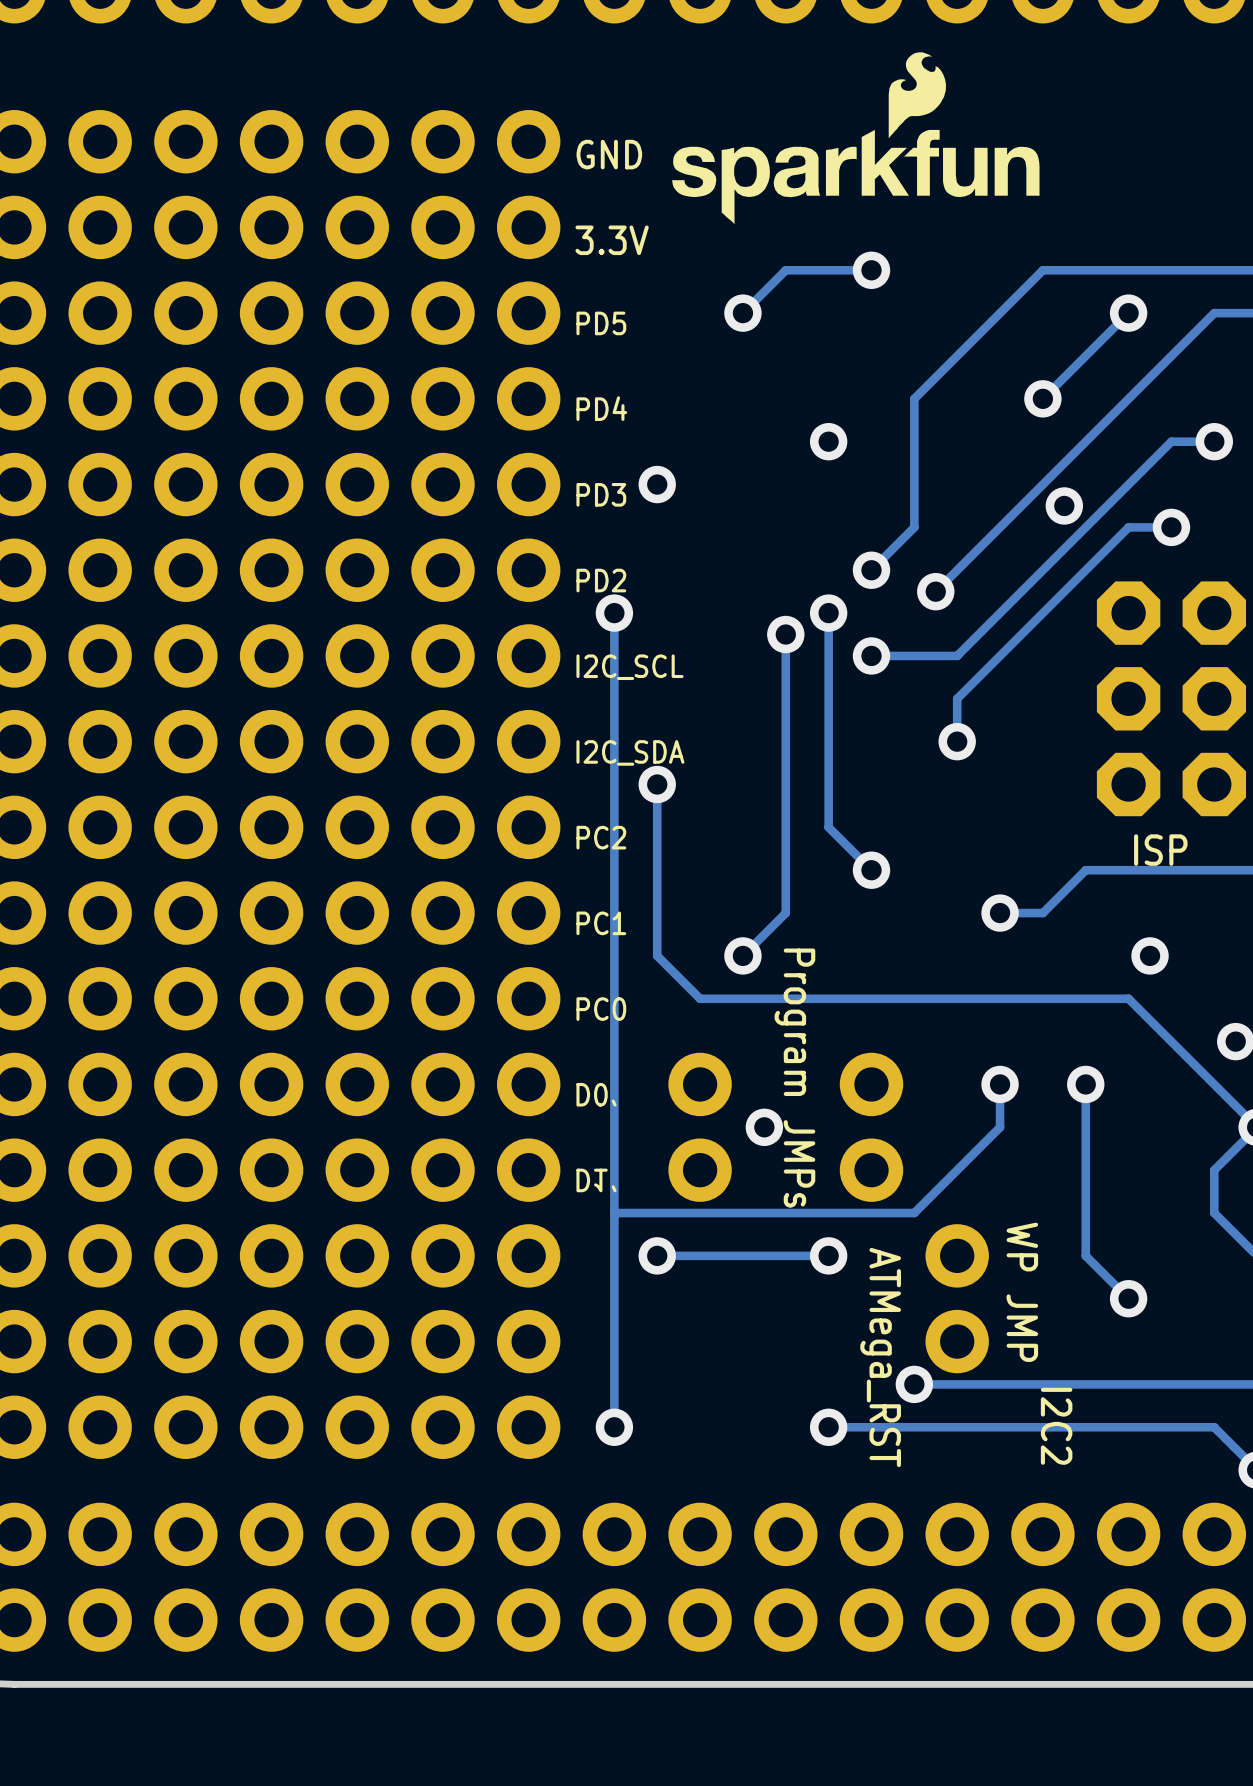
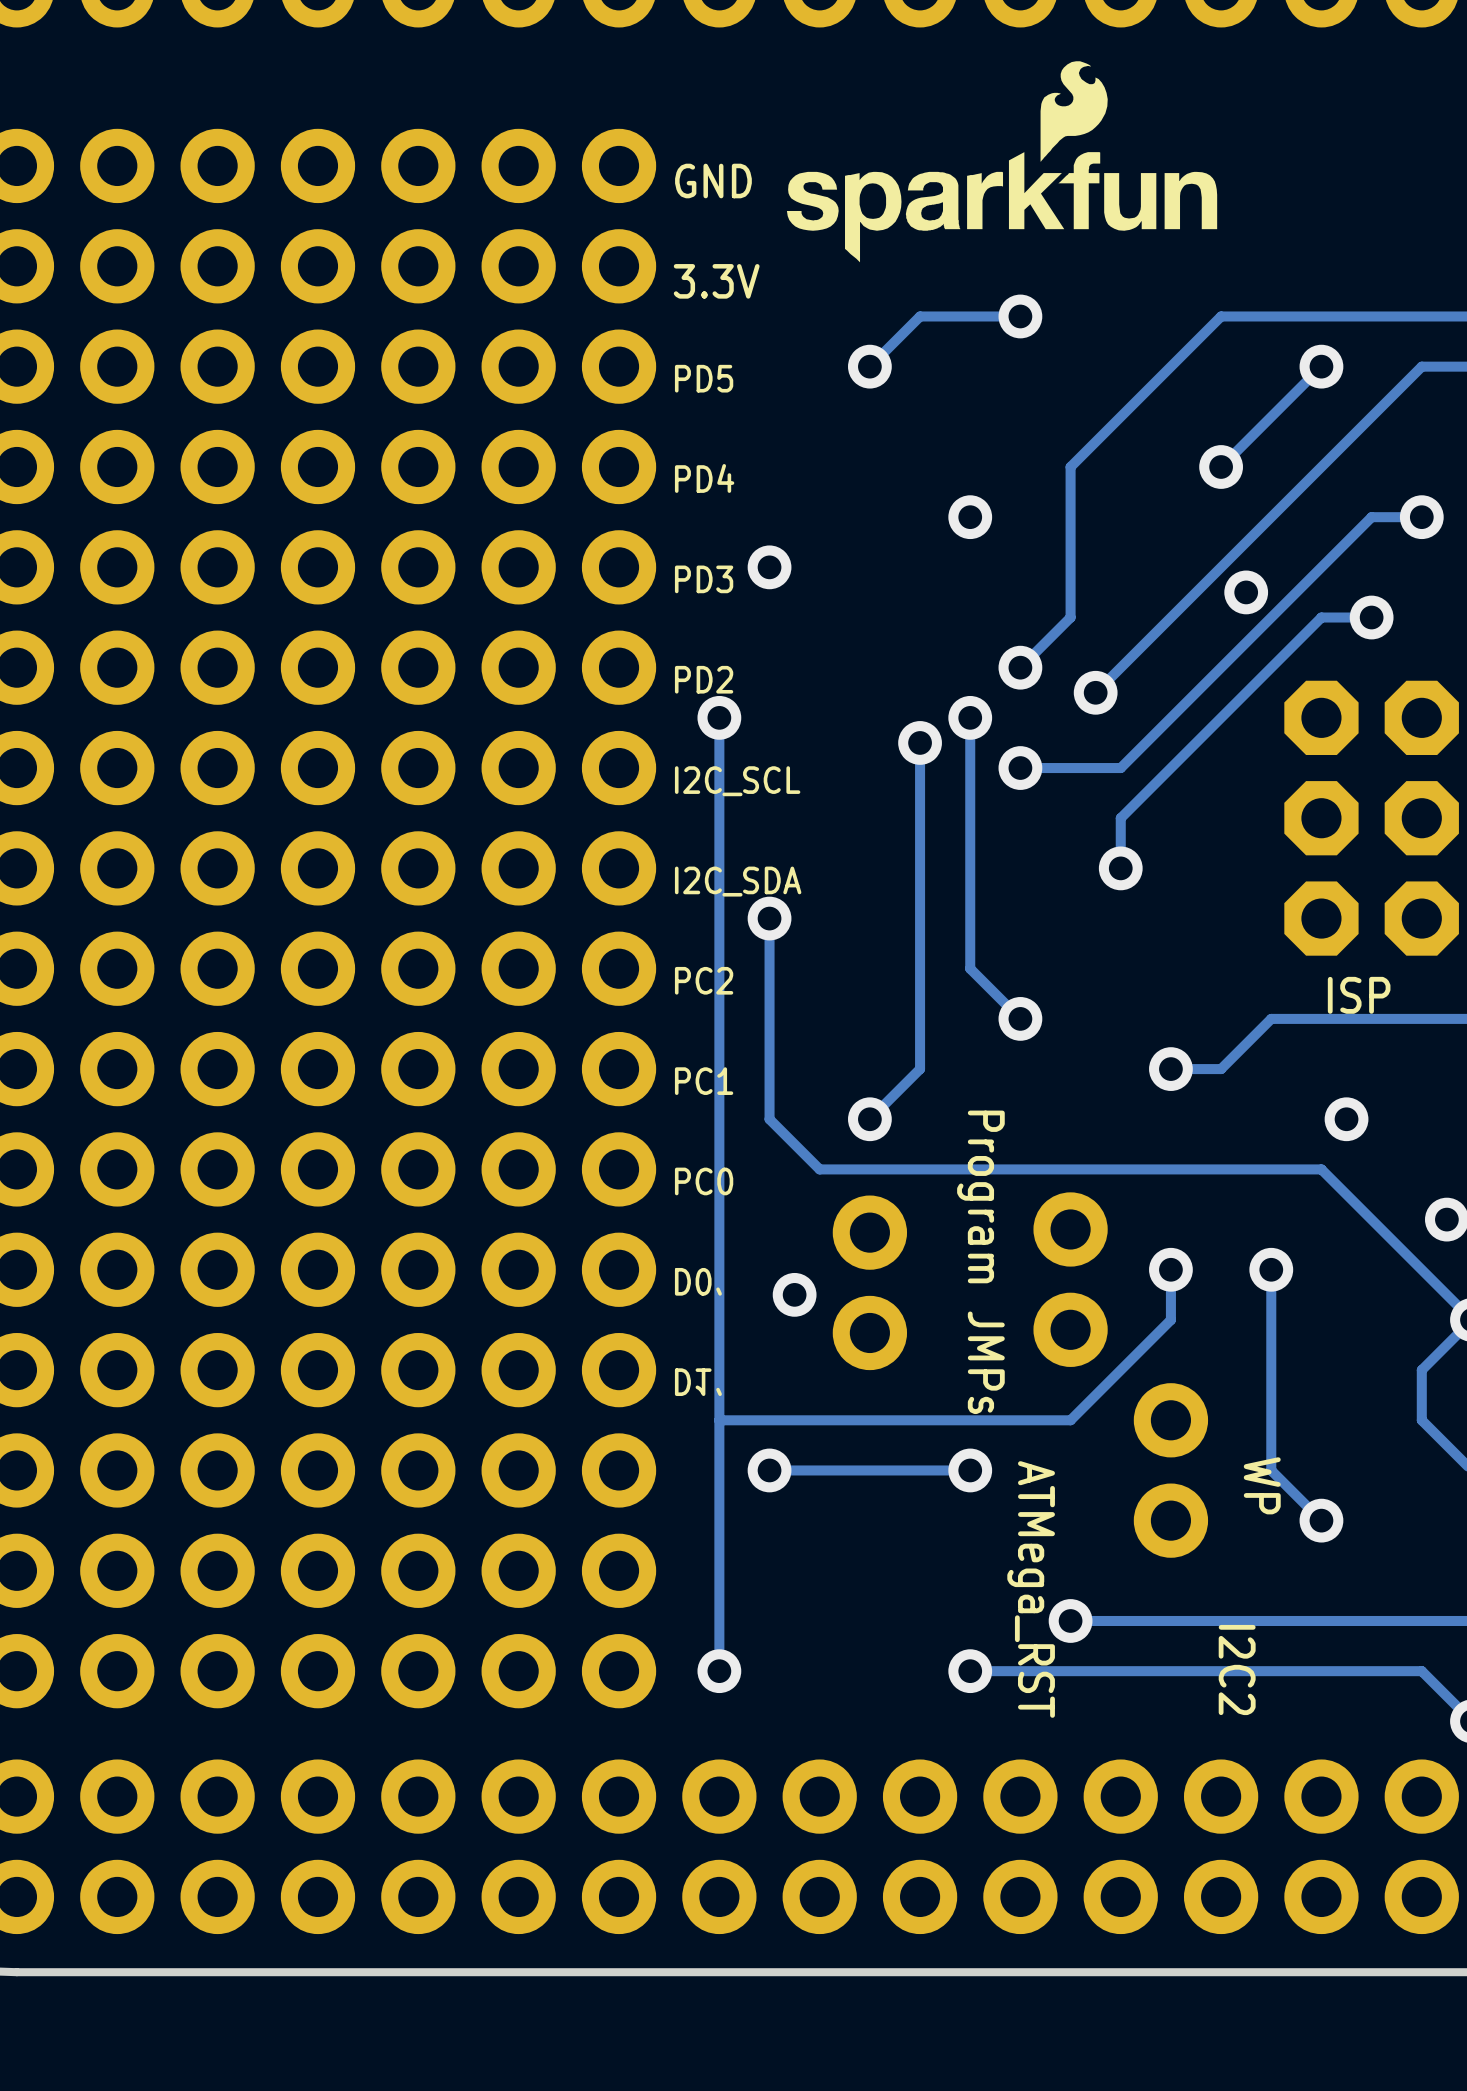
text position: Program JMPs (794, 1078) -> Program JMPs (980, 1262)
part position: (700, 1127) -> (869, 1282)
via position: (764, 1127) -> (794, 1294)
part position: (871, 1127) -> (1070, 1279)
text: none -> WP (1262, 1485)
text: WP JMP (1022, 1292) -> none
part position: (957, 1298) -> (1170, 1470)

